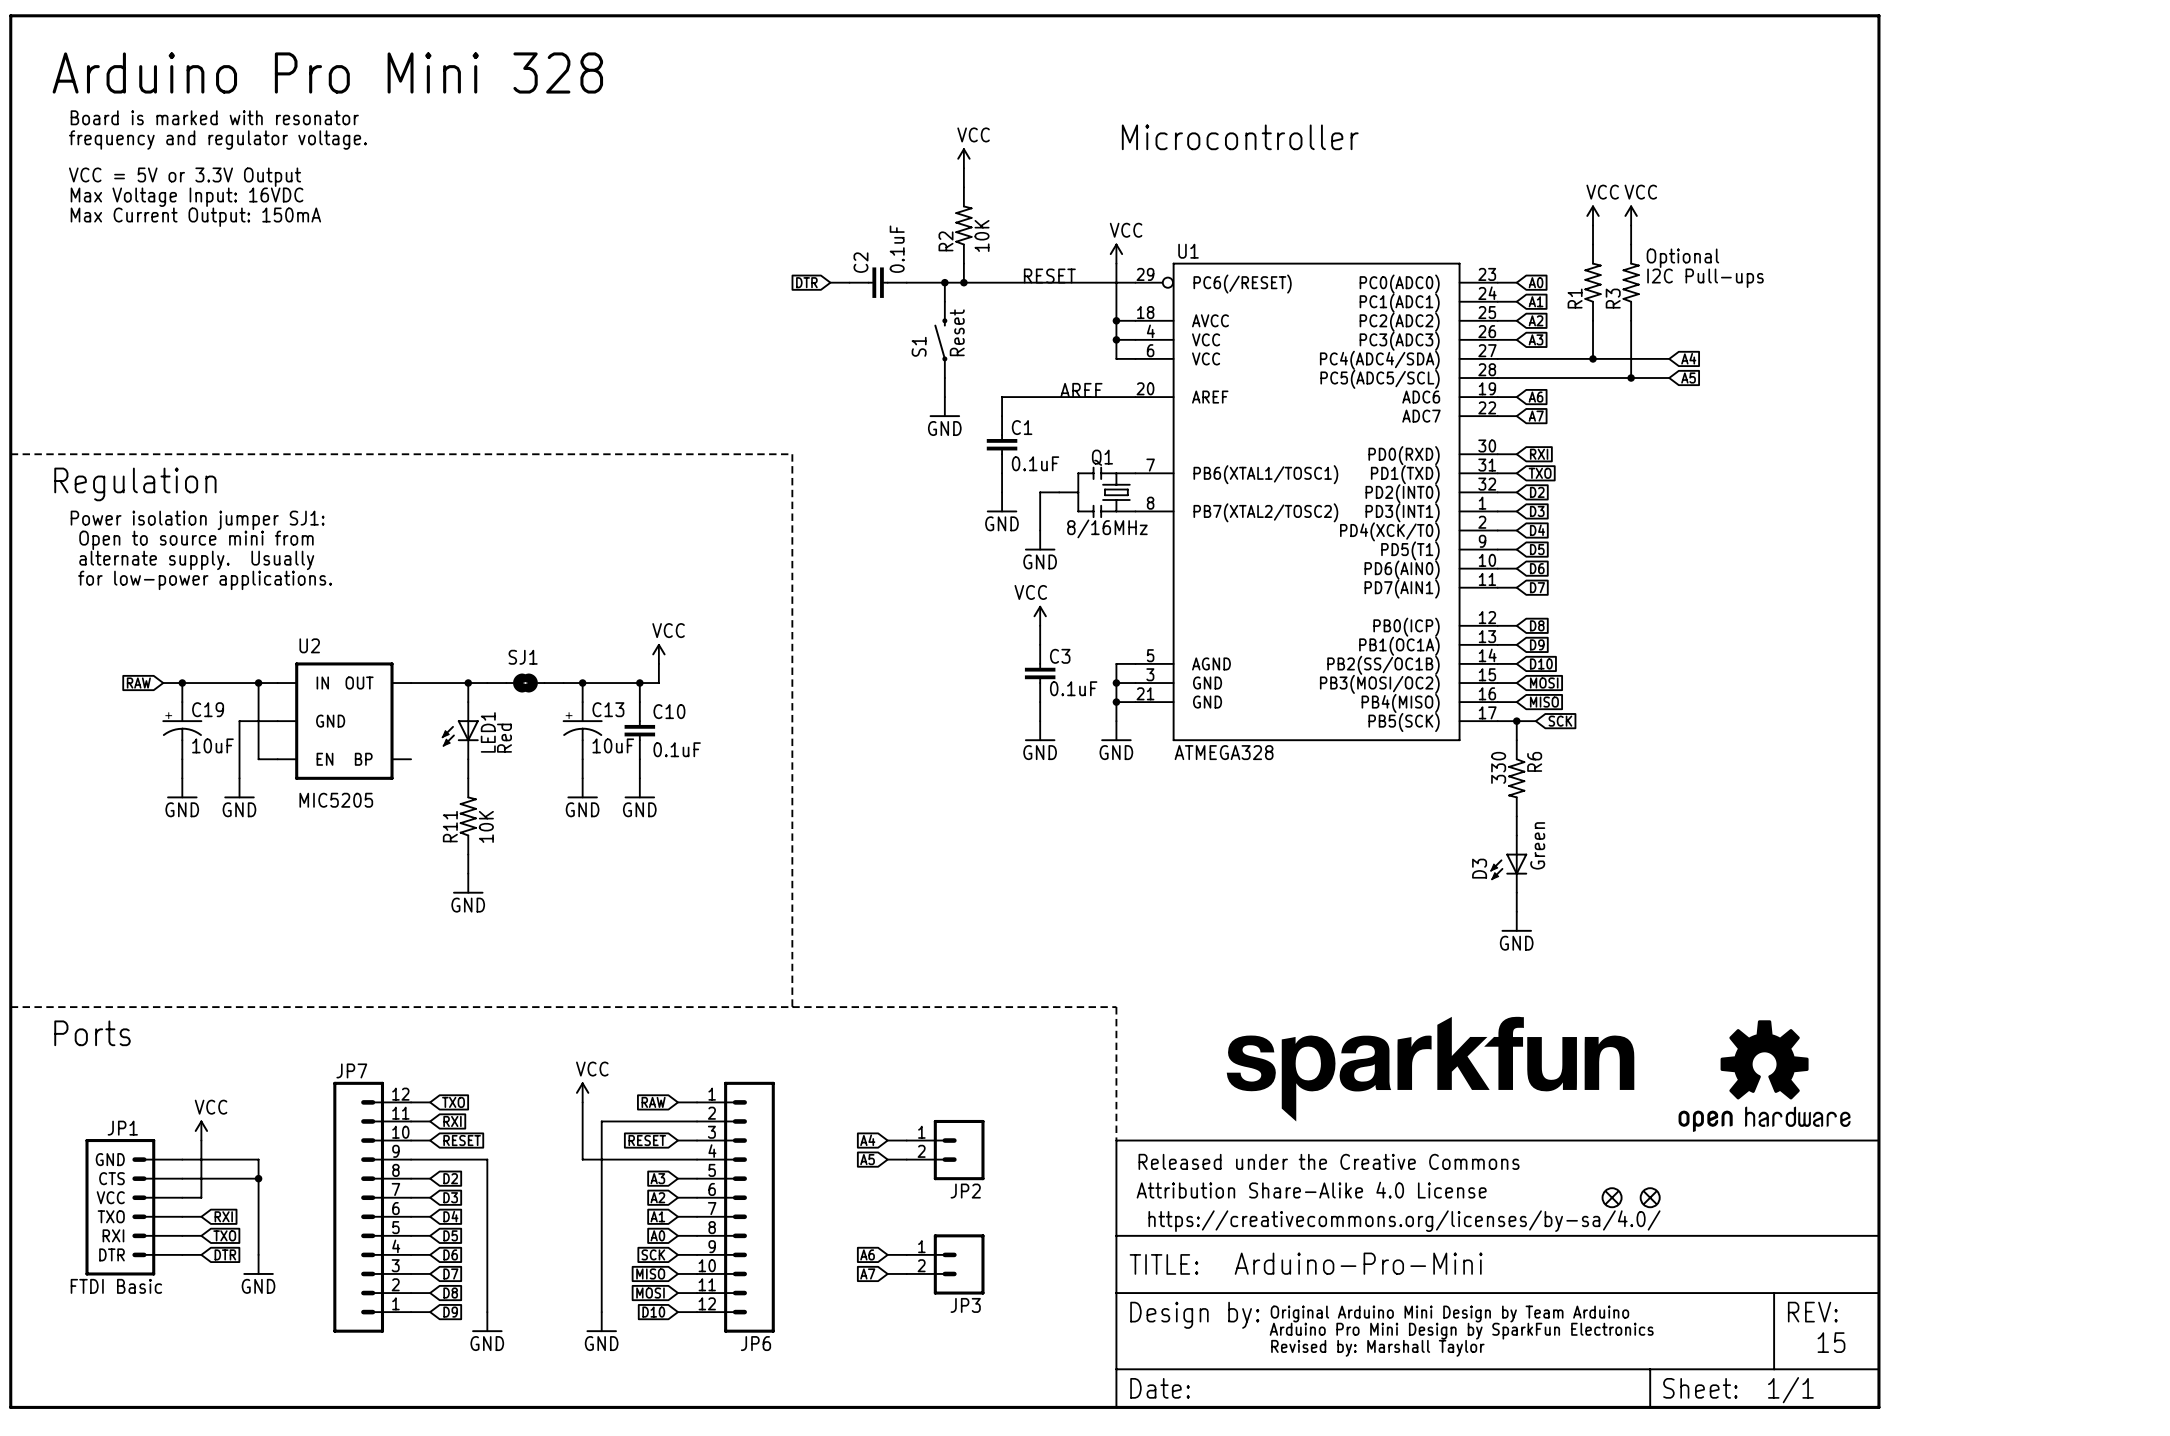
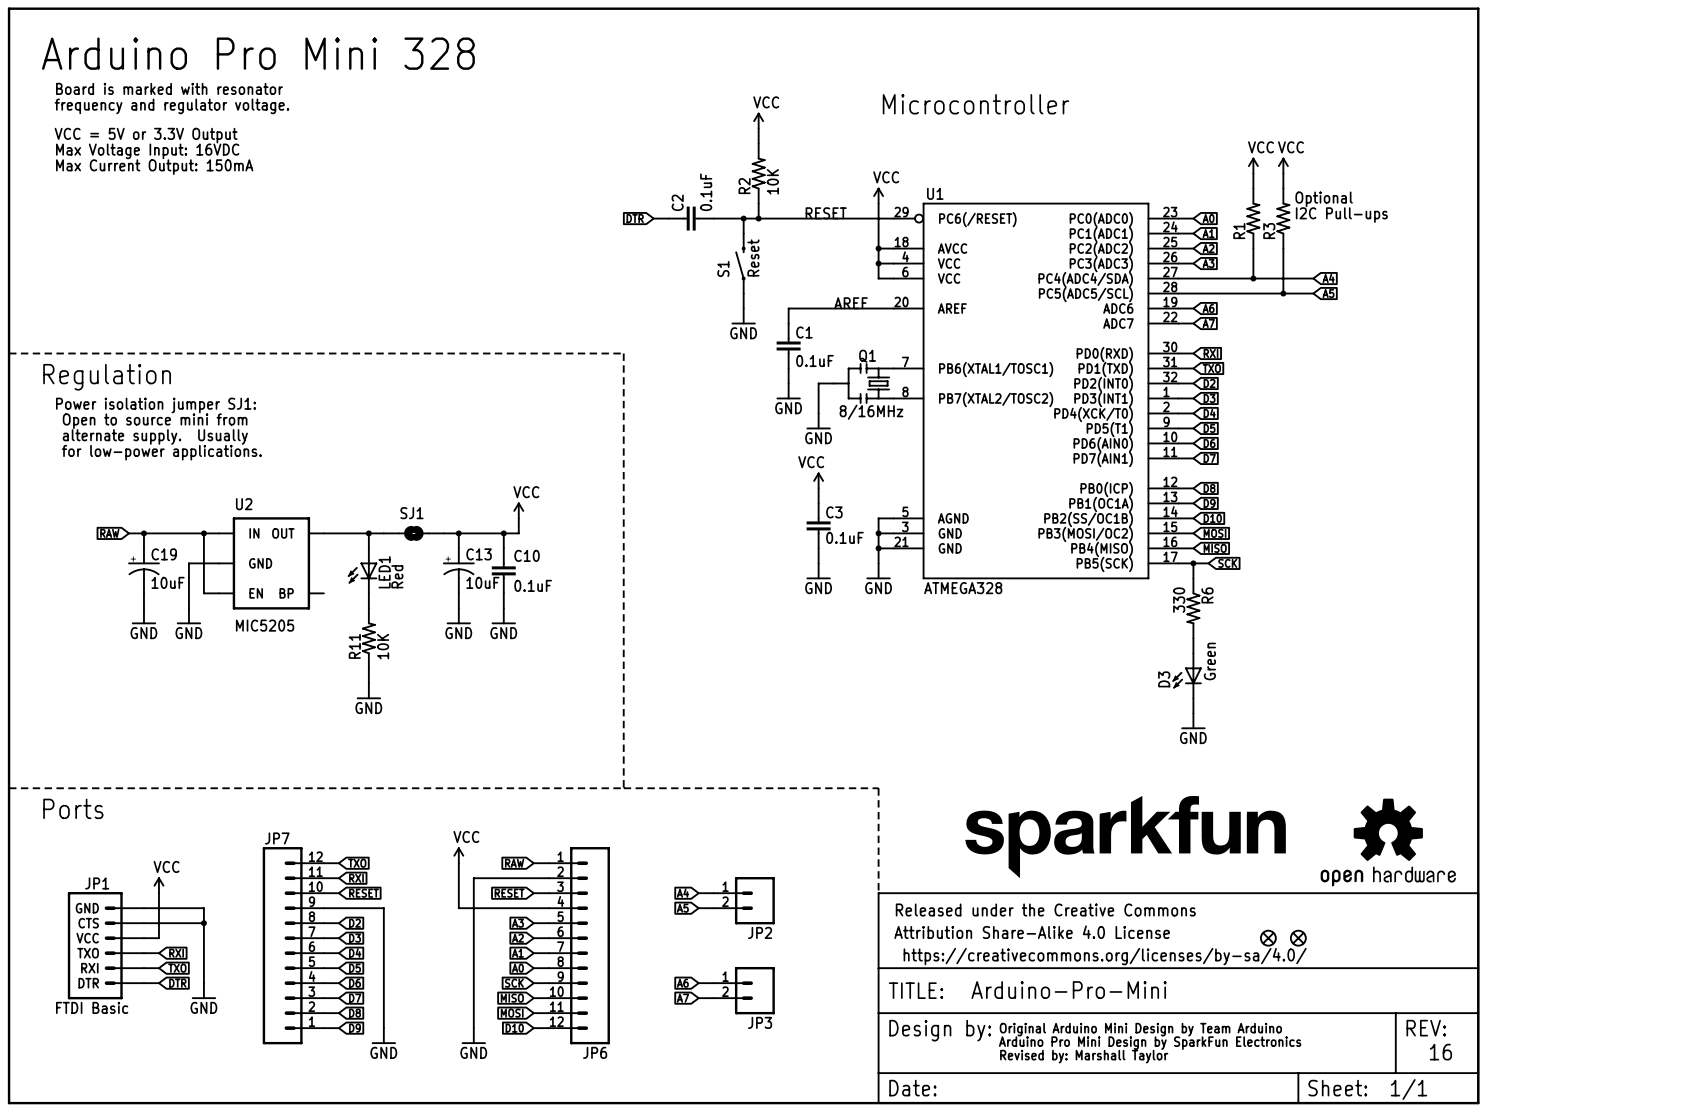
text: 15 (1831, 1342) -> 16 (1440, 1052)

